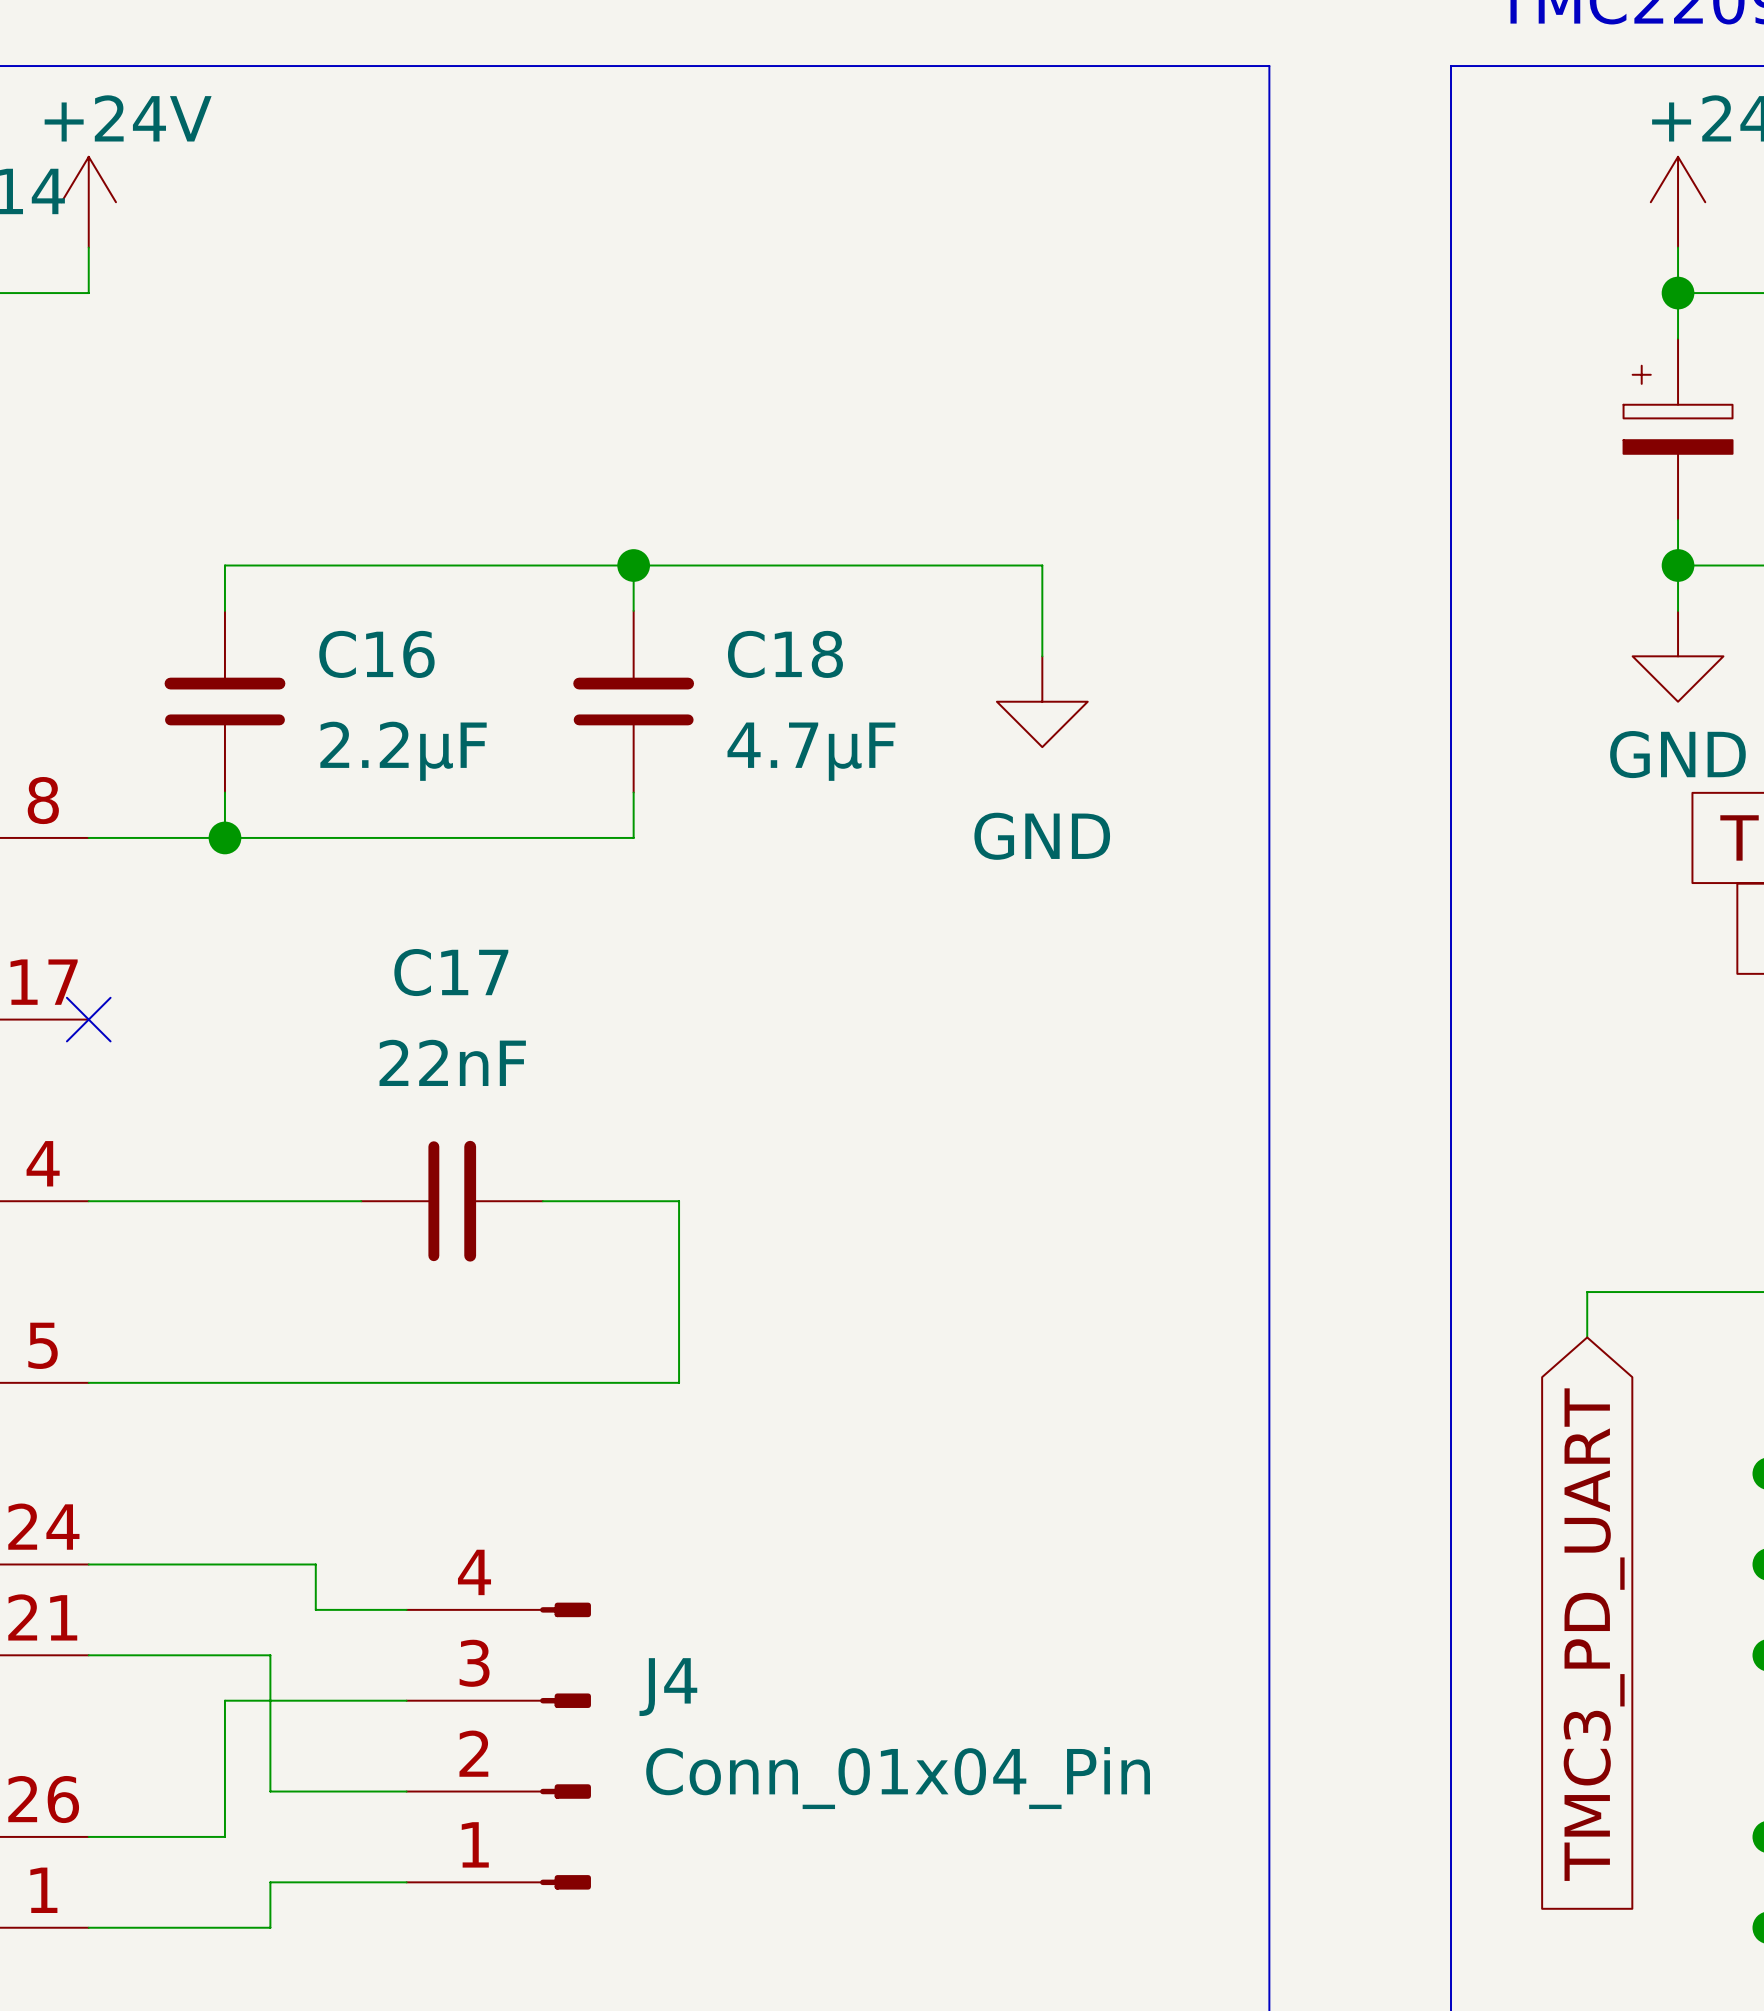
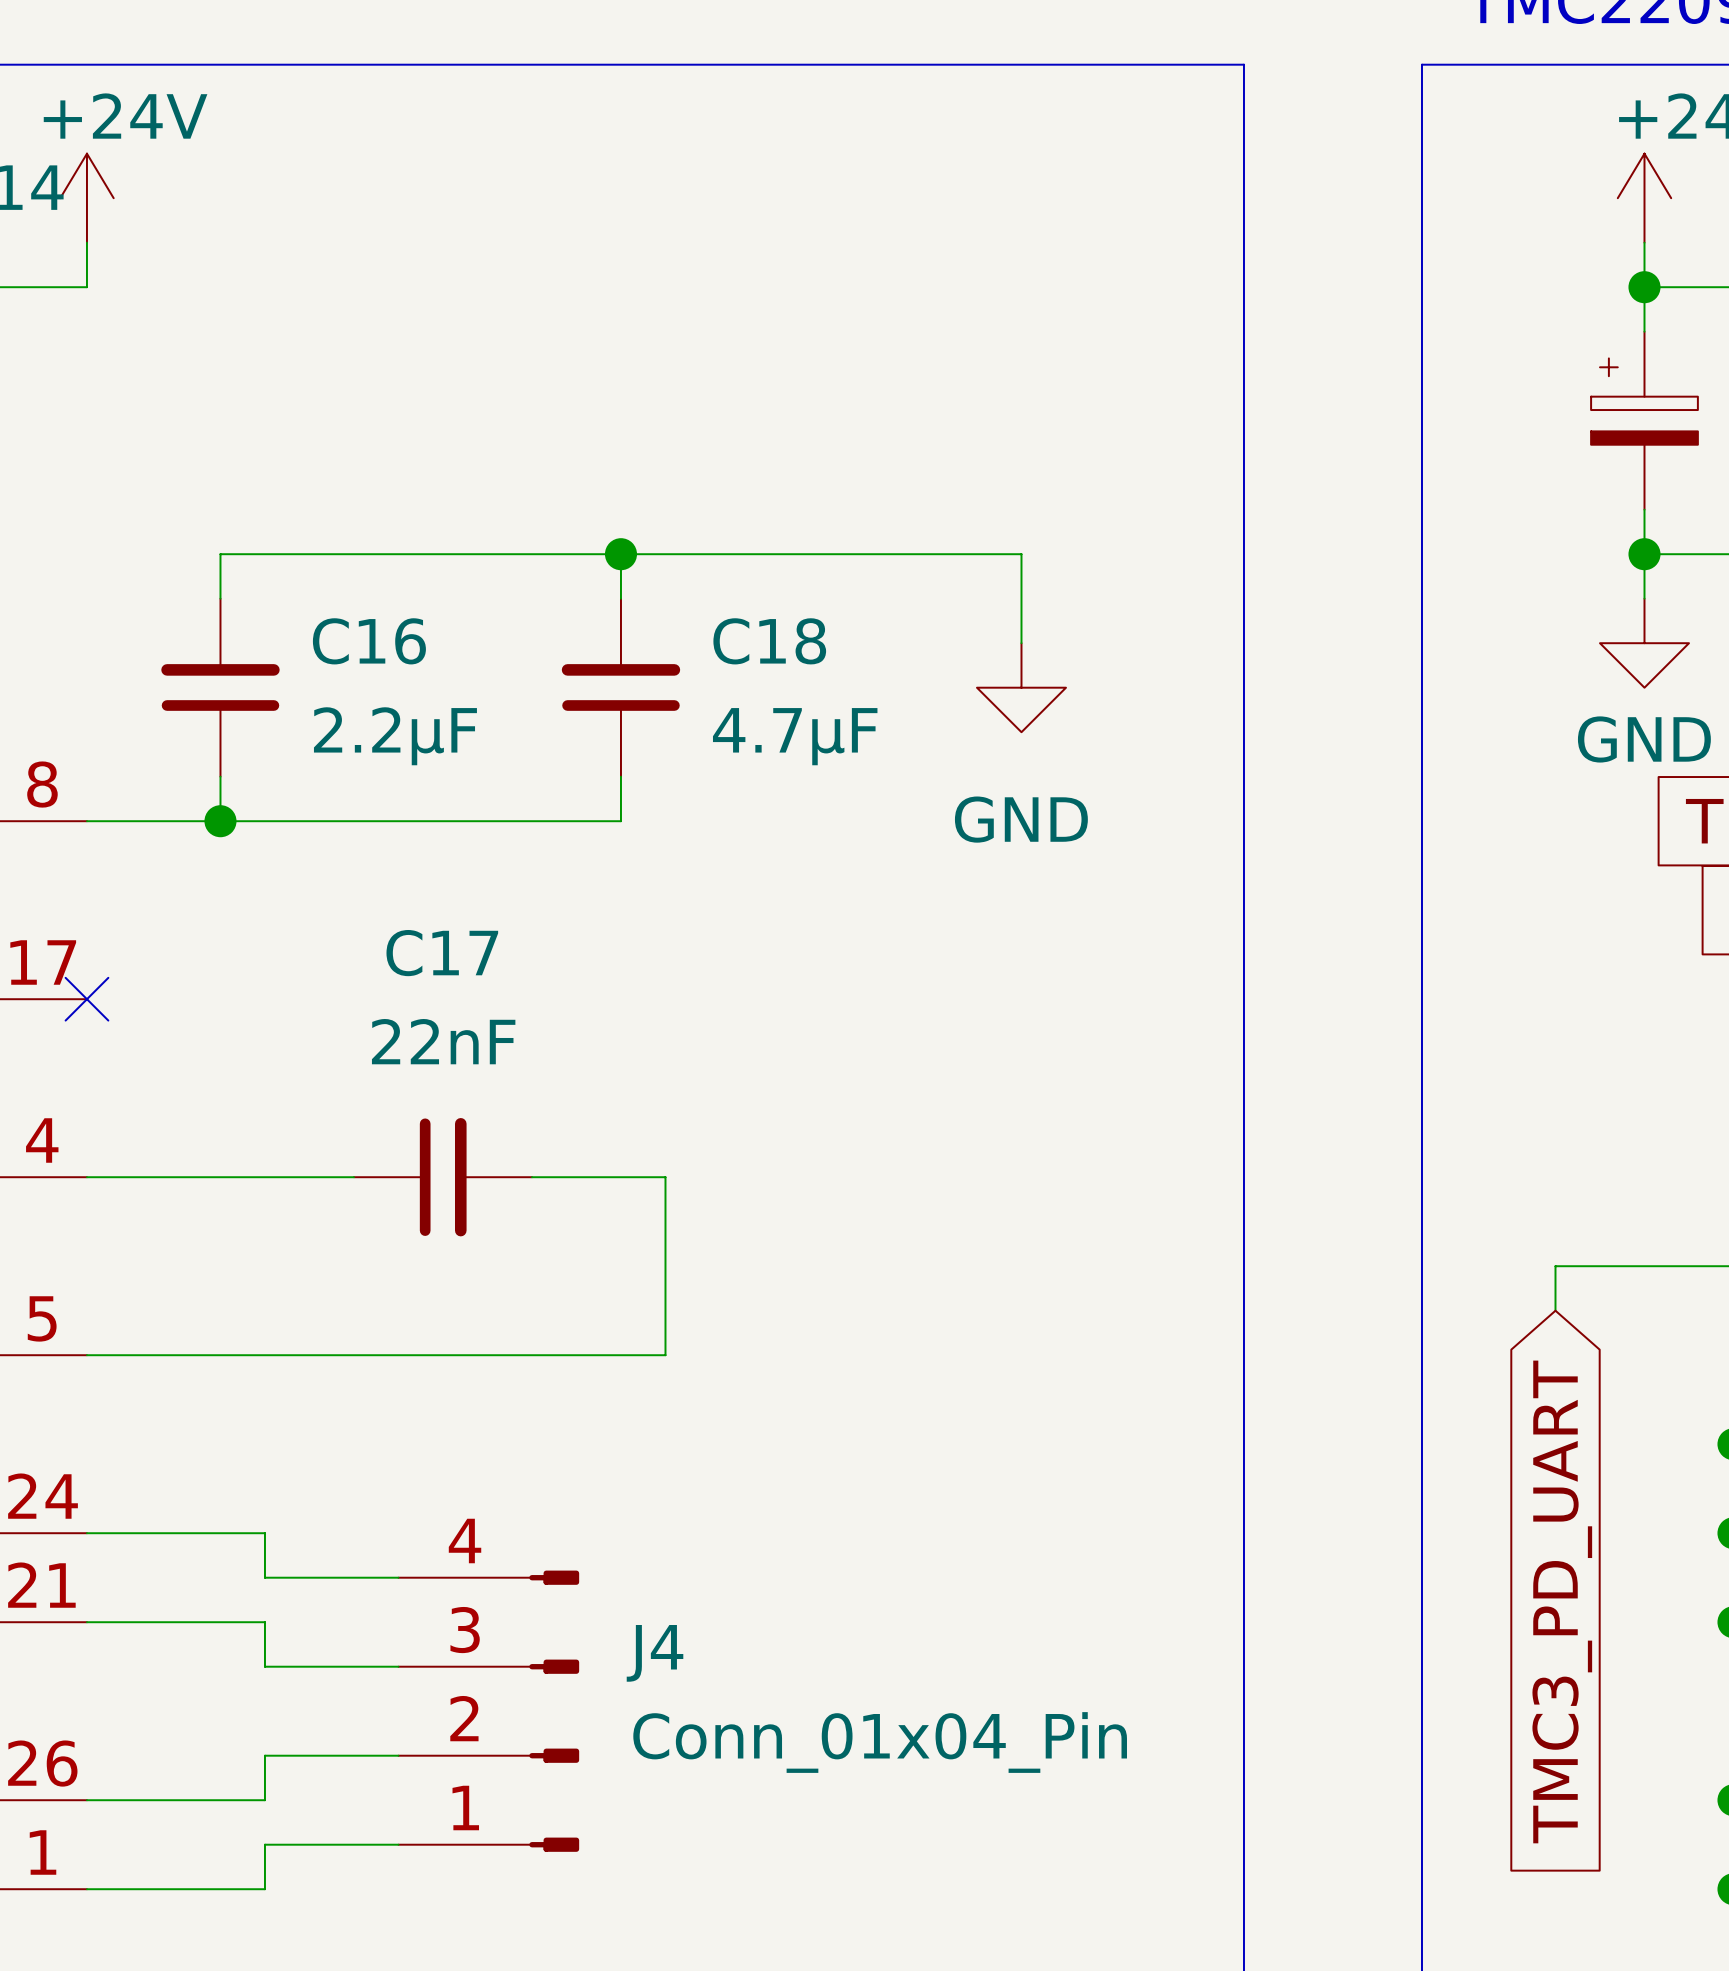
wire: (270, 1564) (315, 1564) (315, 1609) -> (264, 1533) (264, 1577) (309, 1577)
wire: (270, 1791) (270, 1700) (224, 1700) (224, 1836) -> (264, 1755) (264, 1800) (220, 1800)

